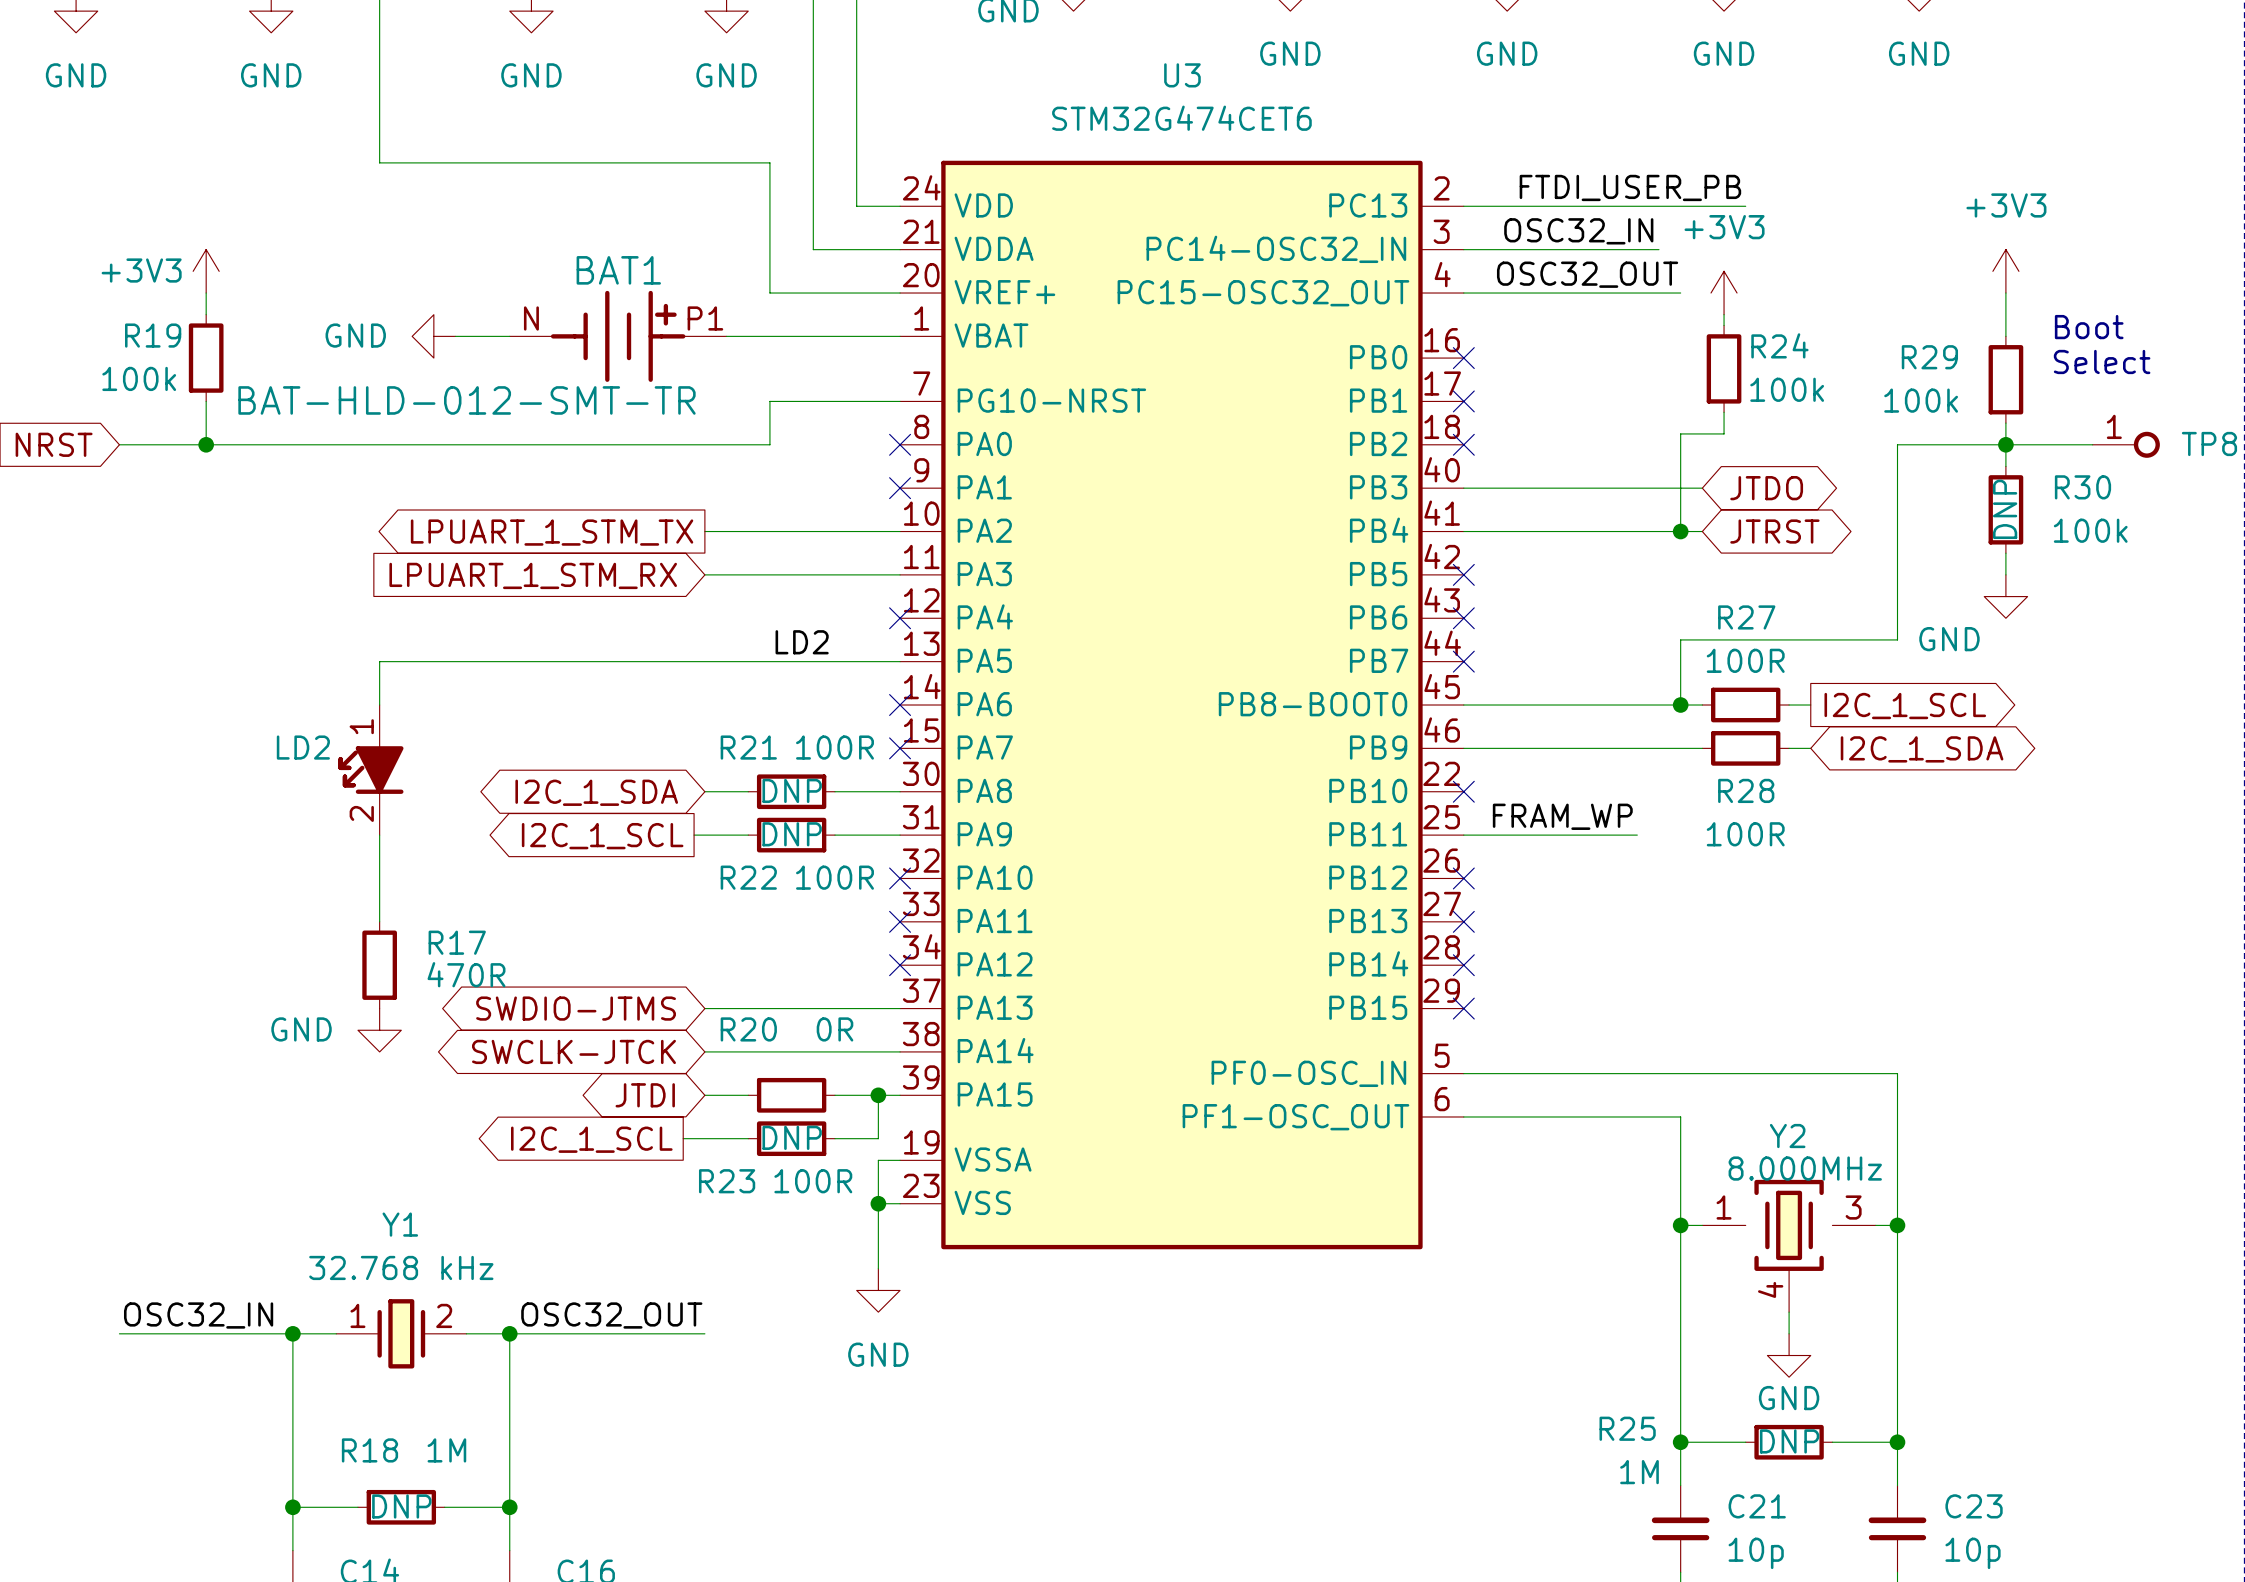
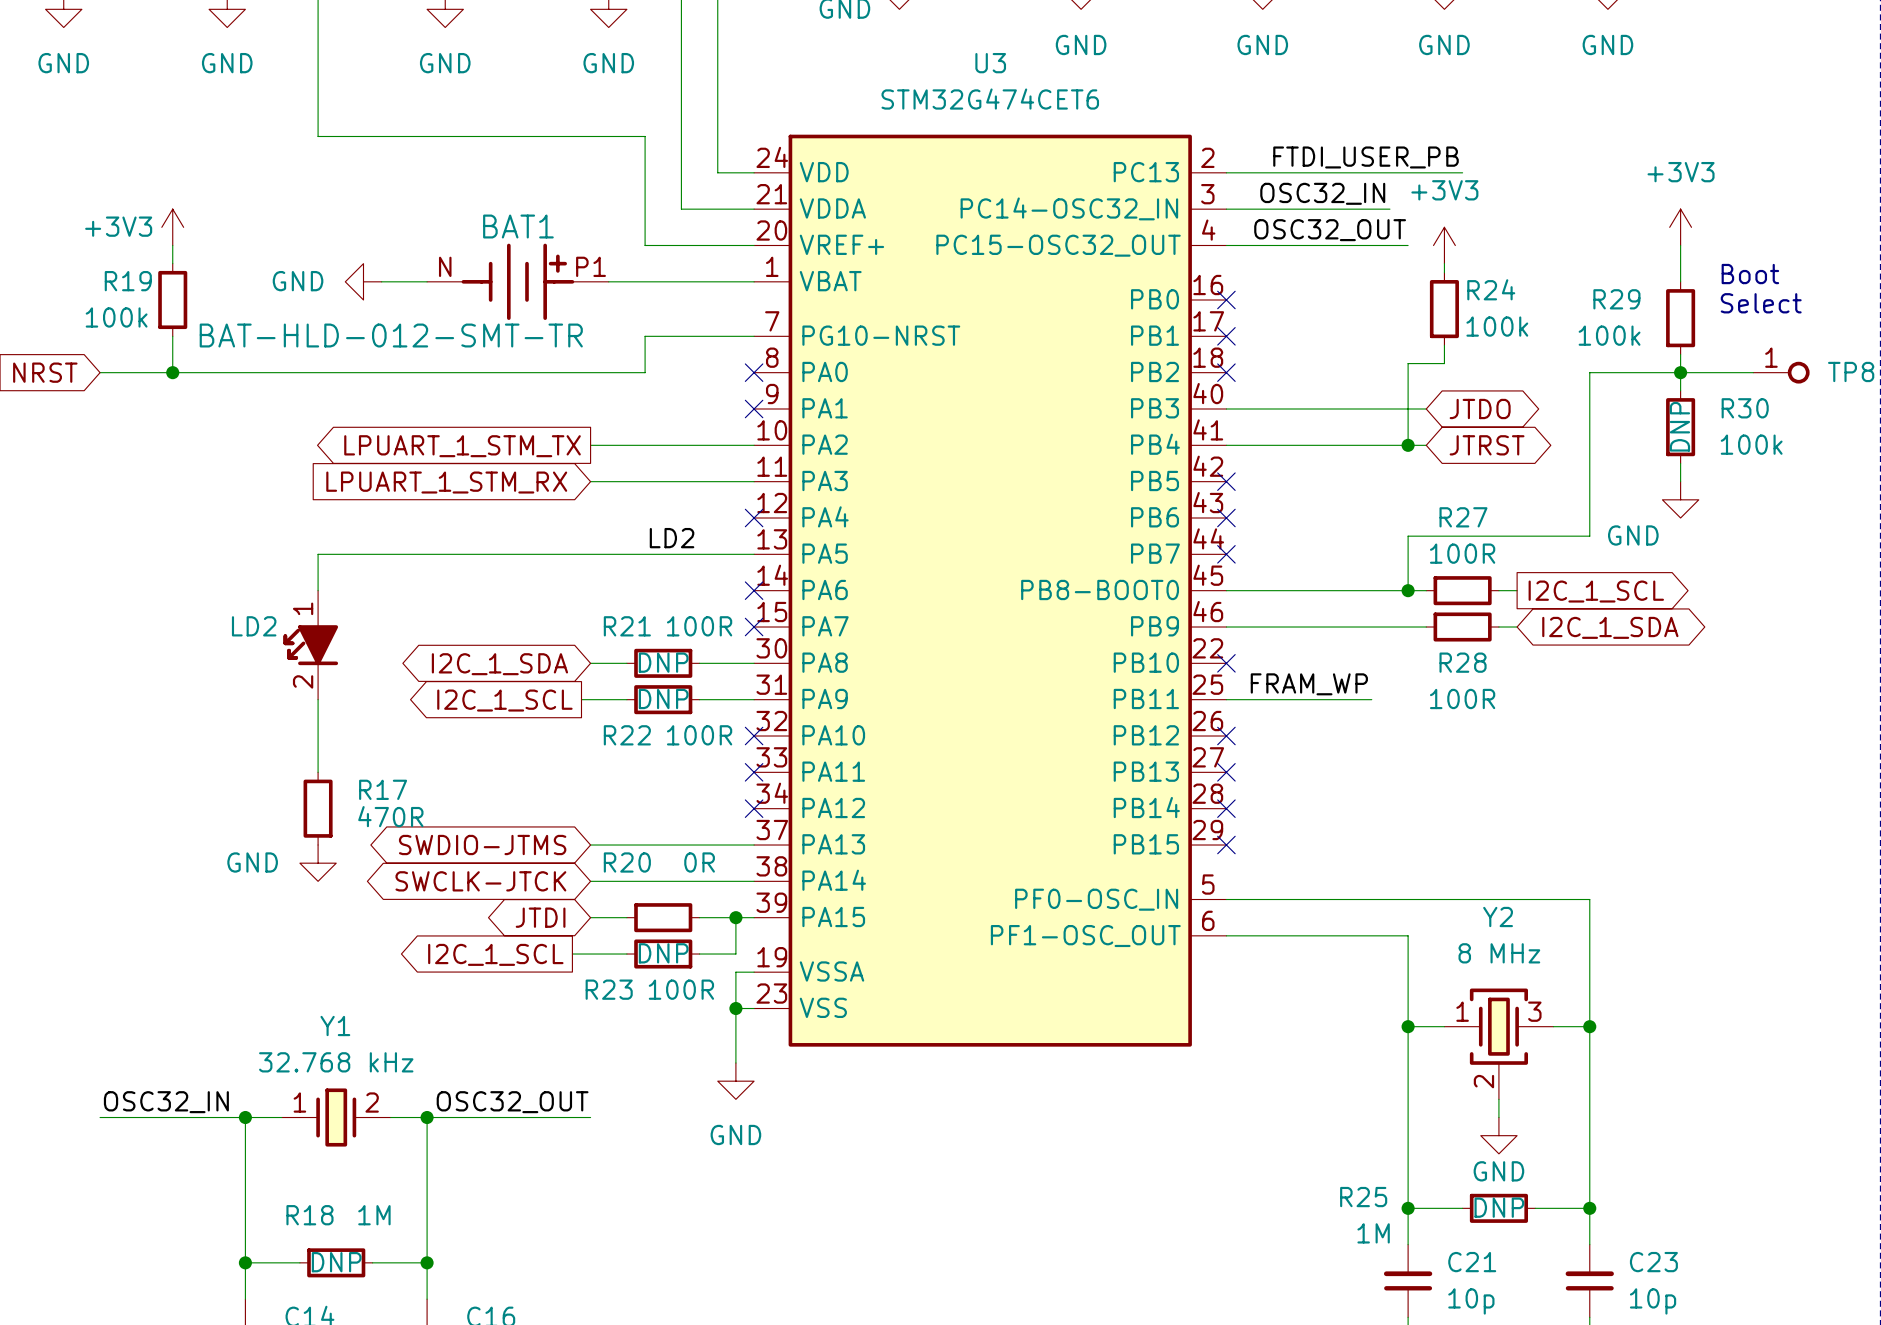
Y2 name position: Y2 (1787, 1136) -> Y2 (1498, 916)
Y2 text: 8.000MHz (1805, 1168) -> 8 MHz (1499, 953)
Y2 symbol: [1702, 1179, 1876, 1313] -> [1444, 988, 1554, 1100]

